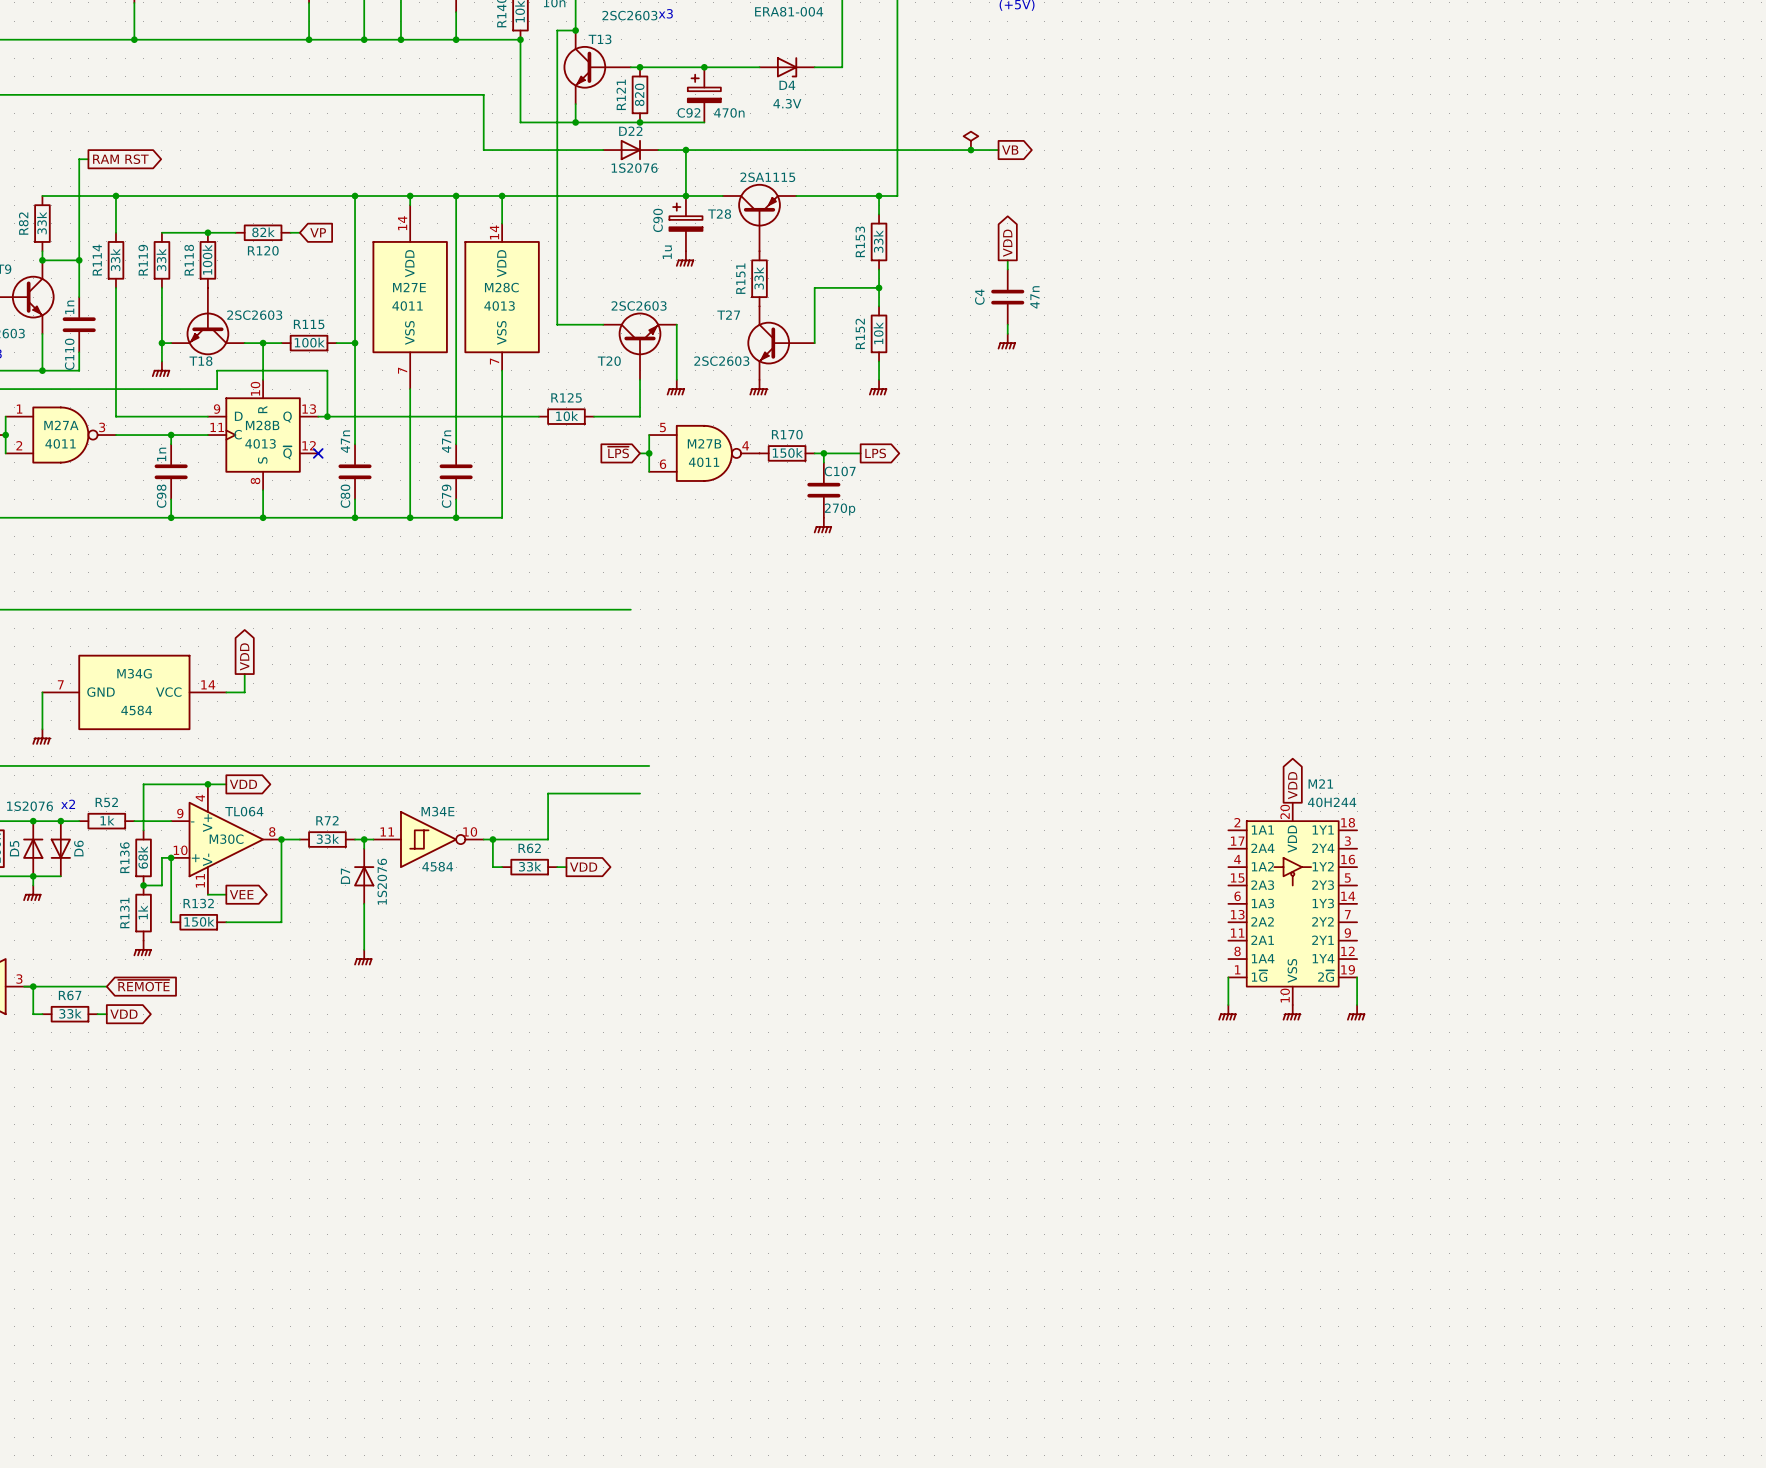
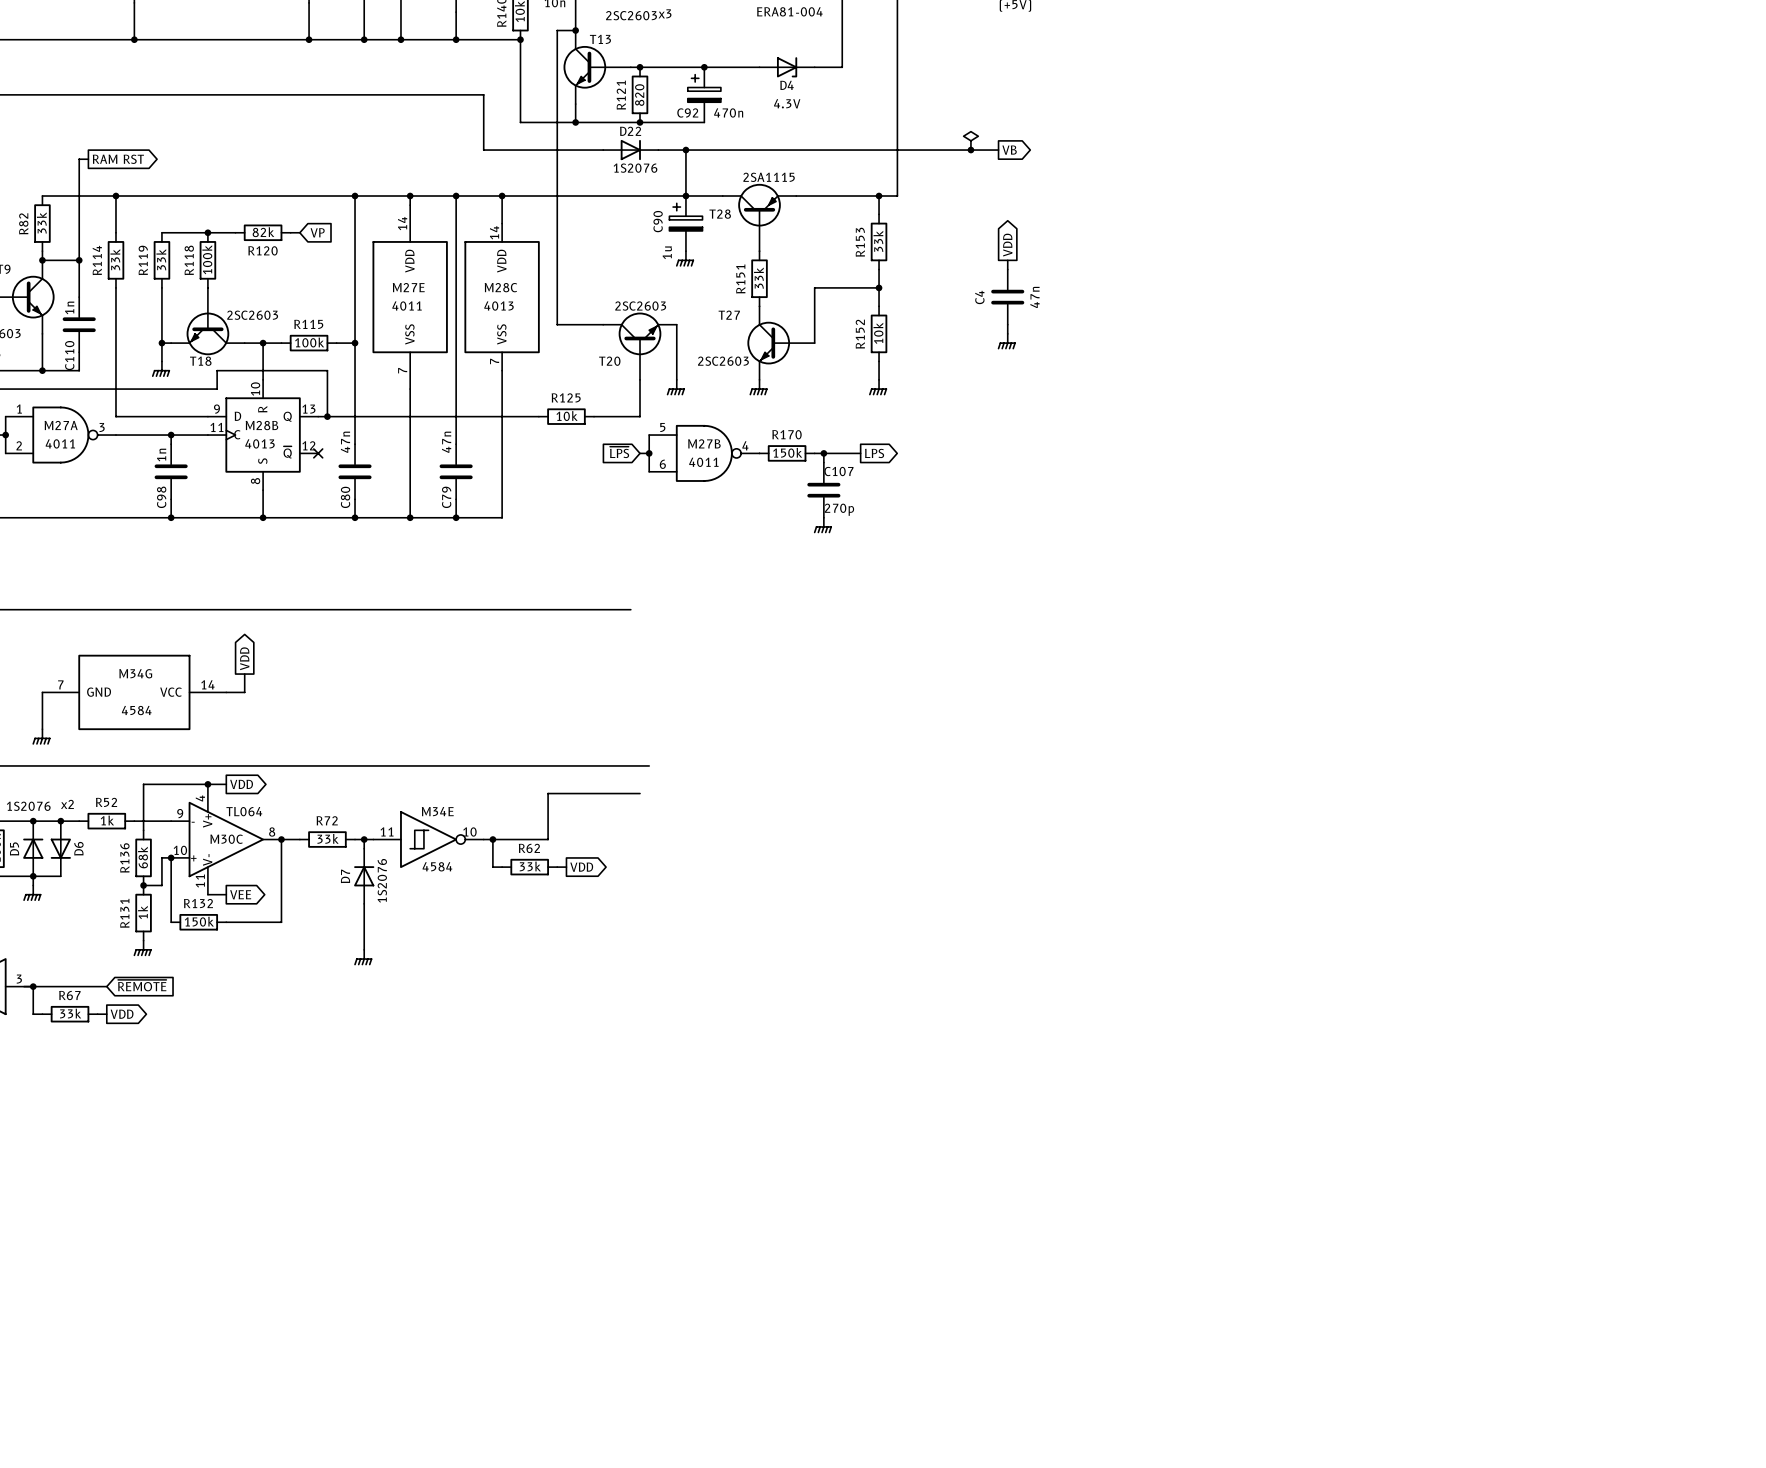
global label: VDD (1292, 785) -> none
M21: 40H244 (1292, 903) -> none
wire: (1228, 977) (1228, 1005) -> none
wire: (1357, 977) (1357, 1005) -> none
power symbol: (1227, 1012) -> none
power symbol: (1291, 1012) -> none
power symbol: (1356, 1012) -> none

